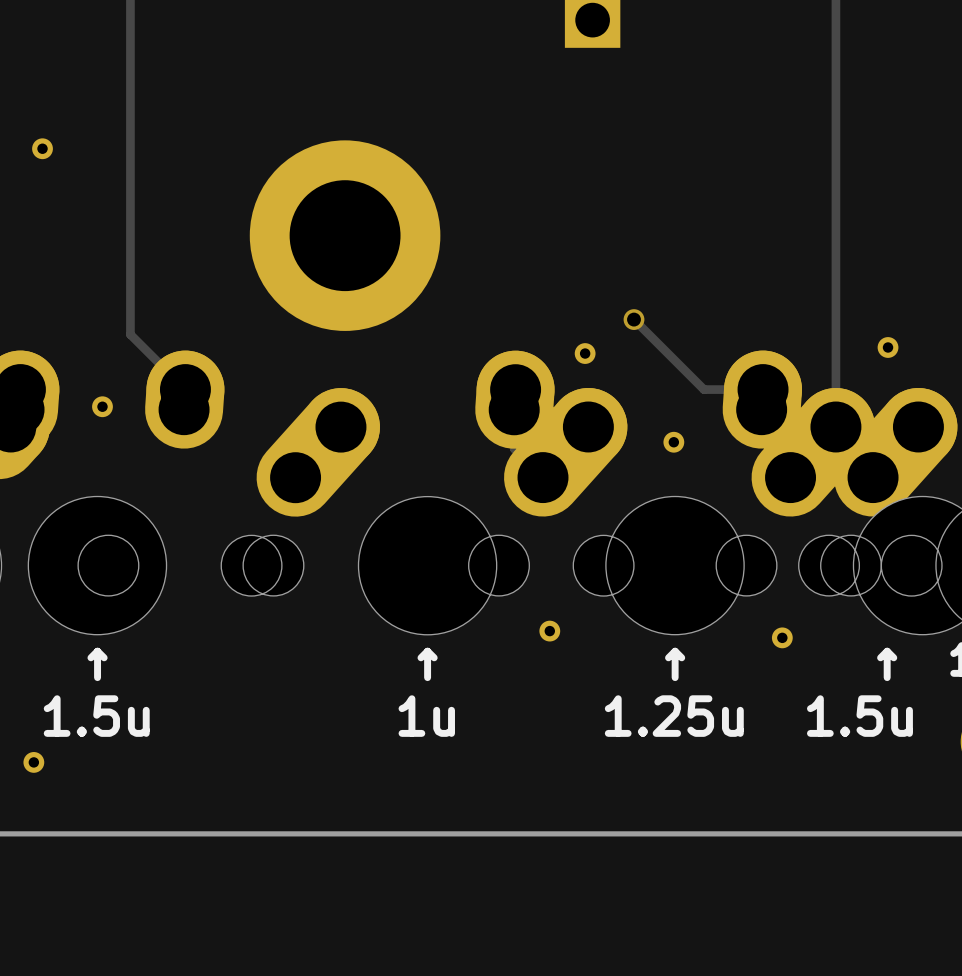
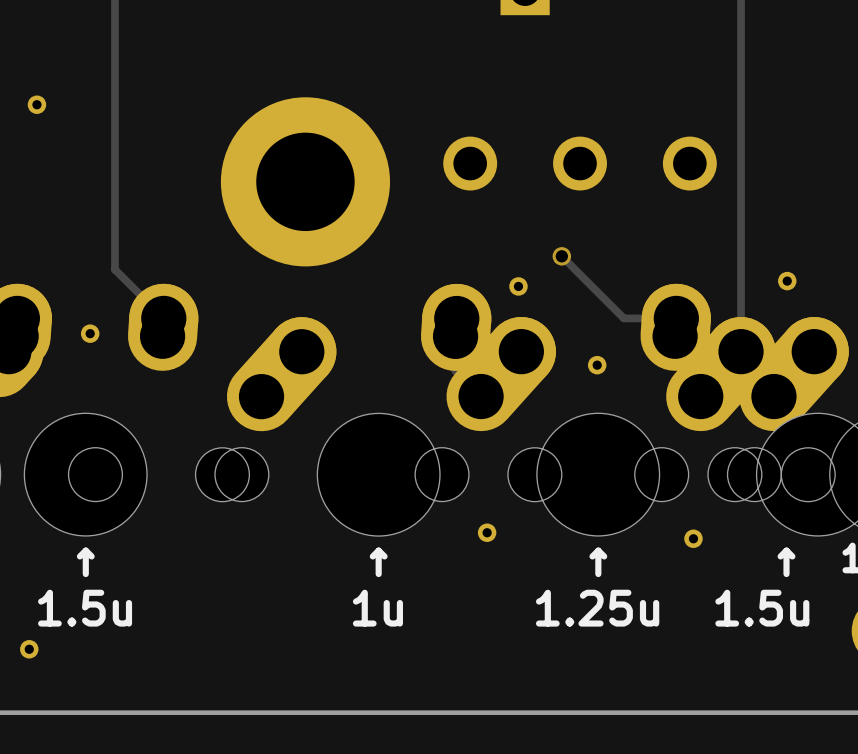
part: none -> (470, 163)
part: none -> (580, 163)
part: none -> (689, 163)

